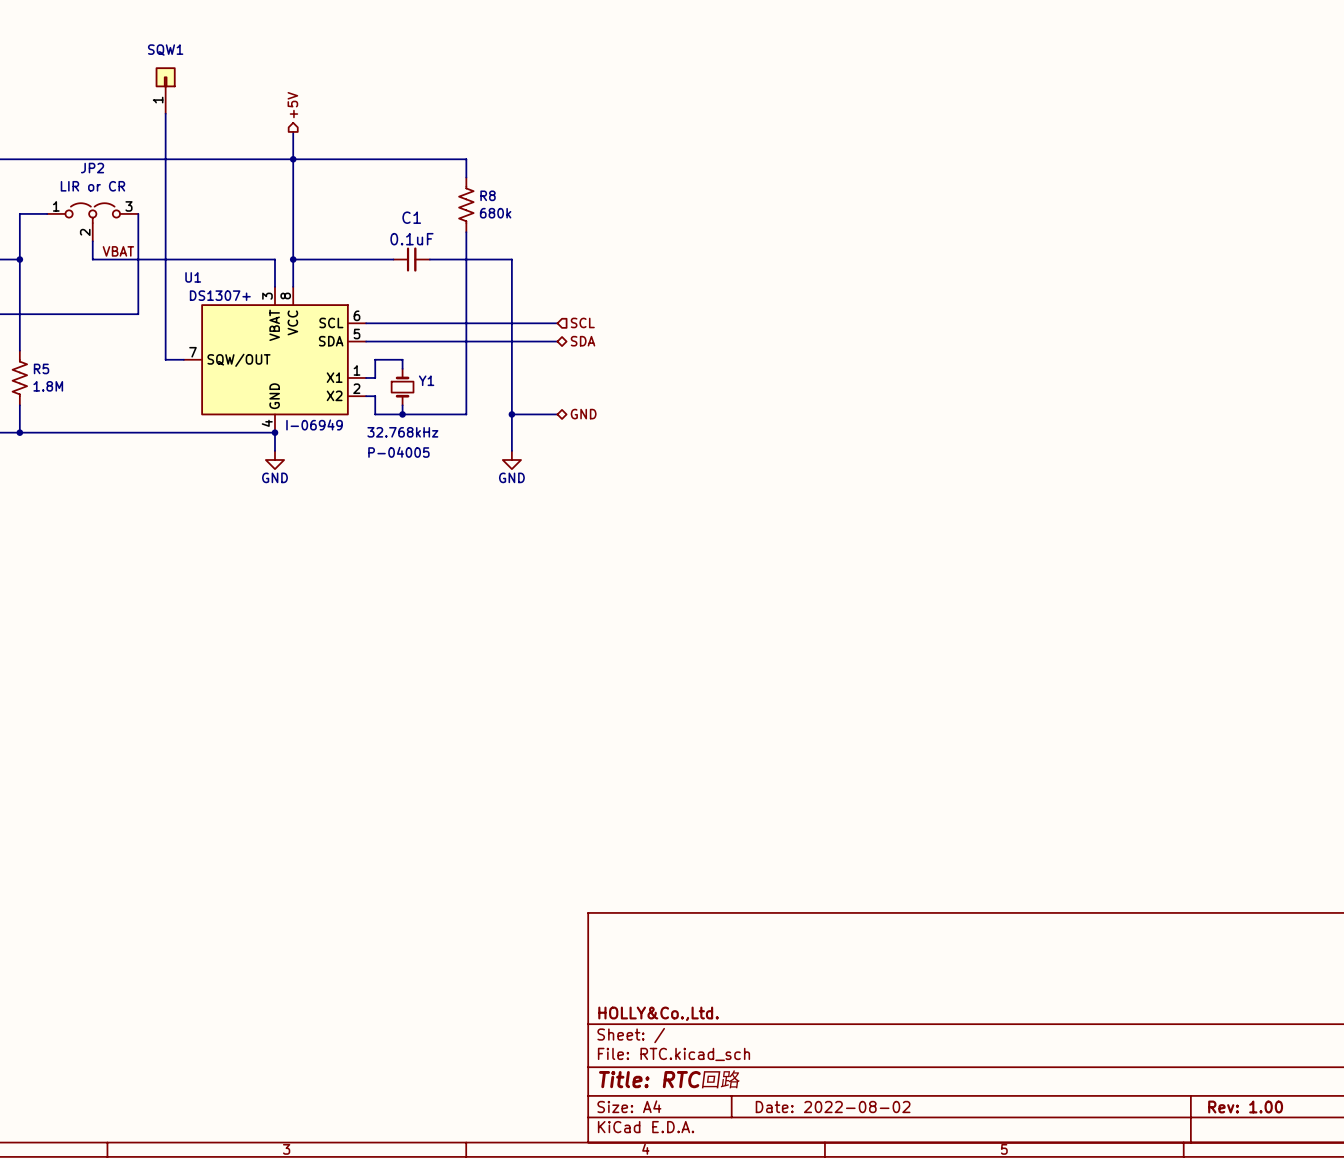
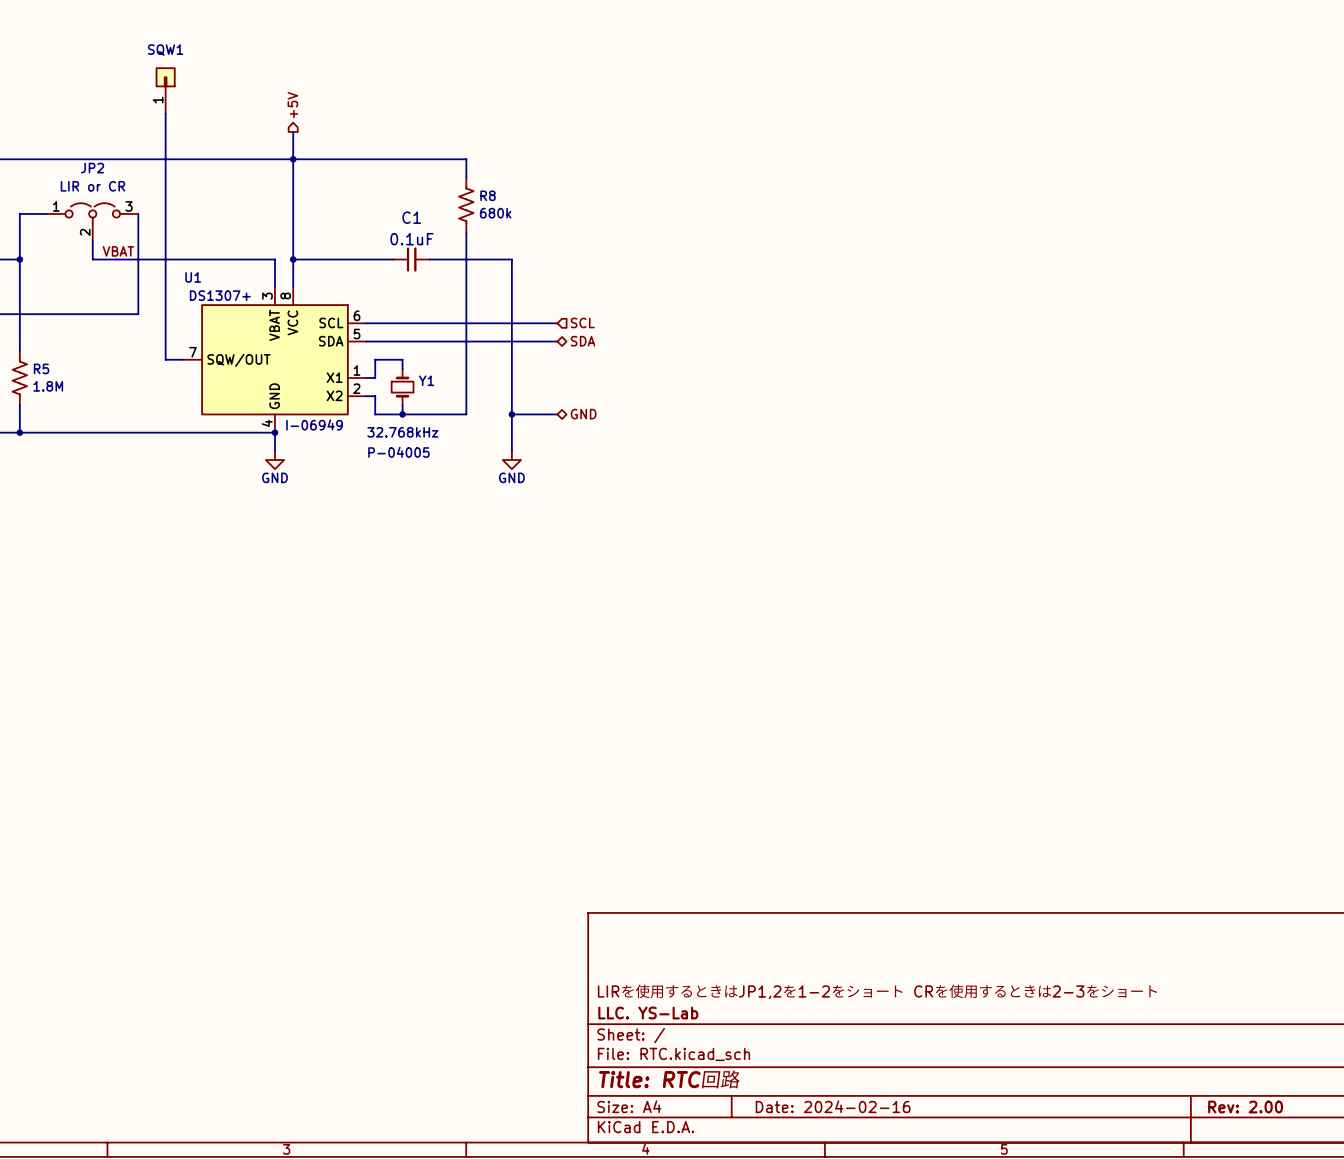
title block: none -> LIRを使用するときはJP1,2を1-2をショート CRを使用するときは2-3をショート (877, 991)
title block: HOLLY&Co.,Ltd. (658, 1013) -> LLC. YS-Lab (648, 1013)
title block: Date: 2022-08-02 (833, 1107) -> Date: 2024-02-16 (833, 1106)
title block: Rev: 1.00 (1245, 1107) -> Rev: 2.00 (1245, 1107)

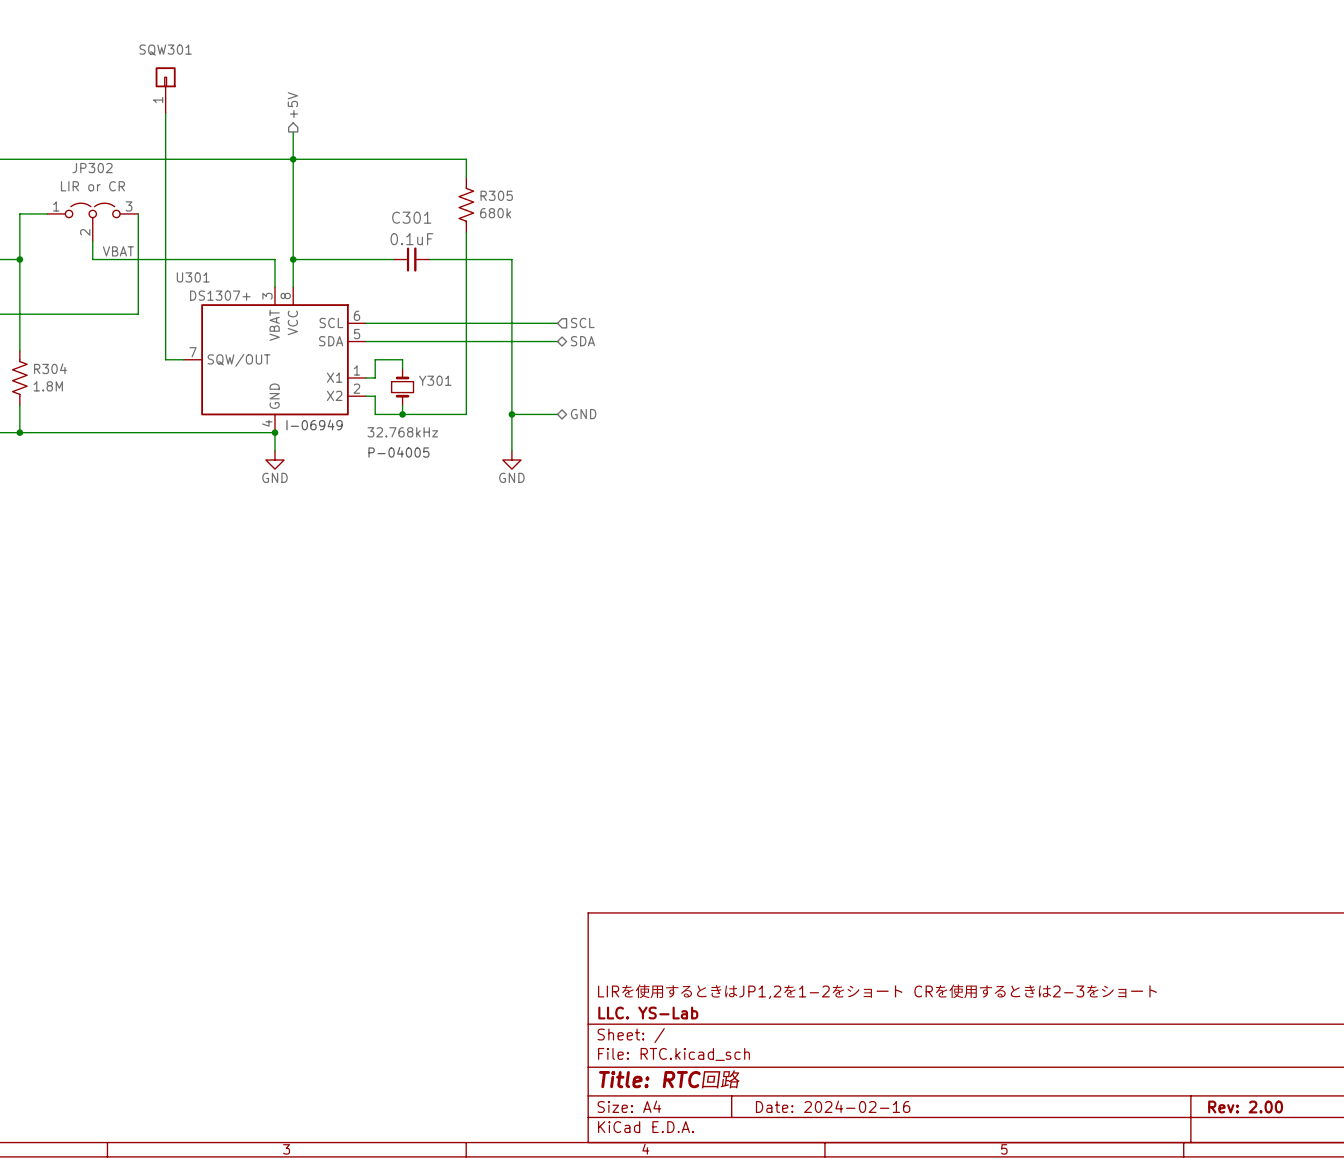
SQW1 name: SQW1 (165, 50) -> SQW301 (165, 50)
JP2 name: JP2 (92, 168) -> JP302 (92, 168)
R8 name: R8 (488, 195) -> R305 (496, 195)
C1 name: C1 (411, 217) -> C301 (411, 217)
U1 name: U1 (193, 277) -> U301 (193, 277)
R5 name: R5 (41, 368) -> R304 (50, 368)
Y1 name: Y1 (426, 380) -> Y301 (435, 380)

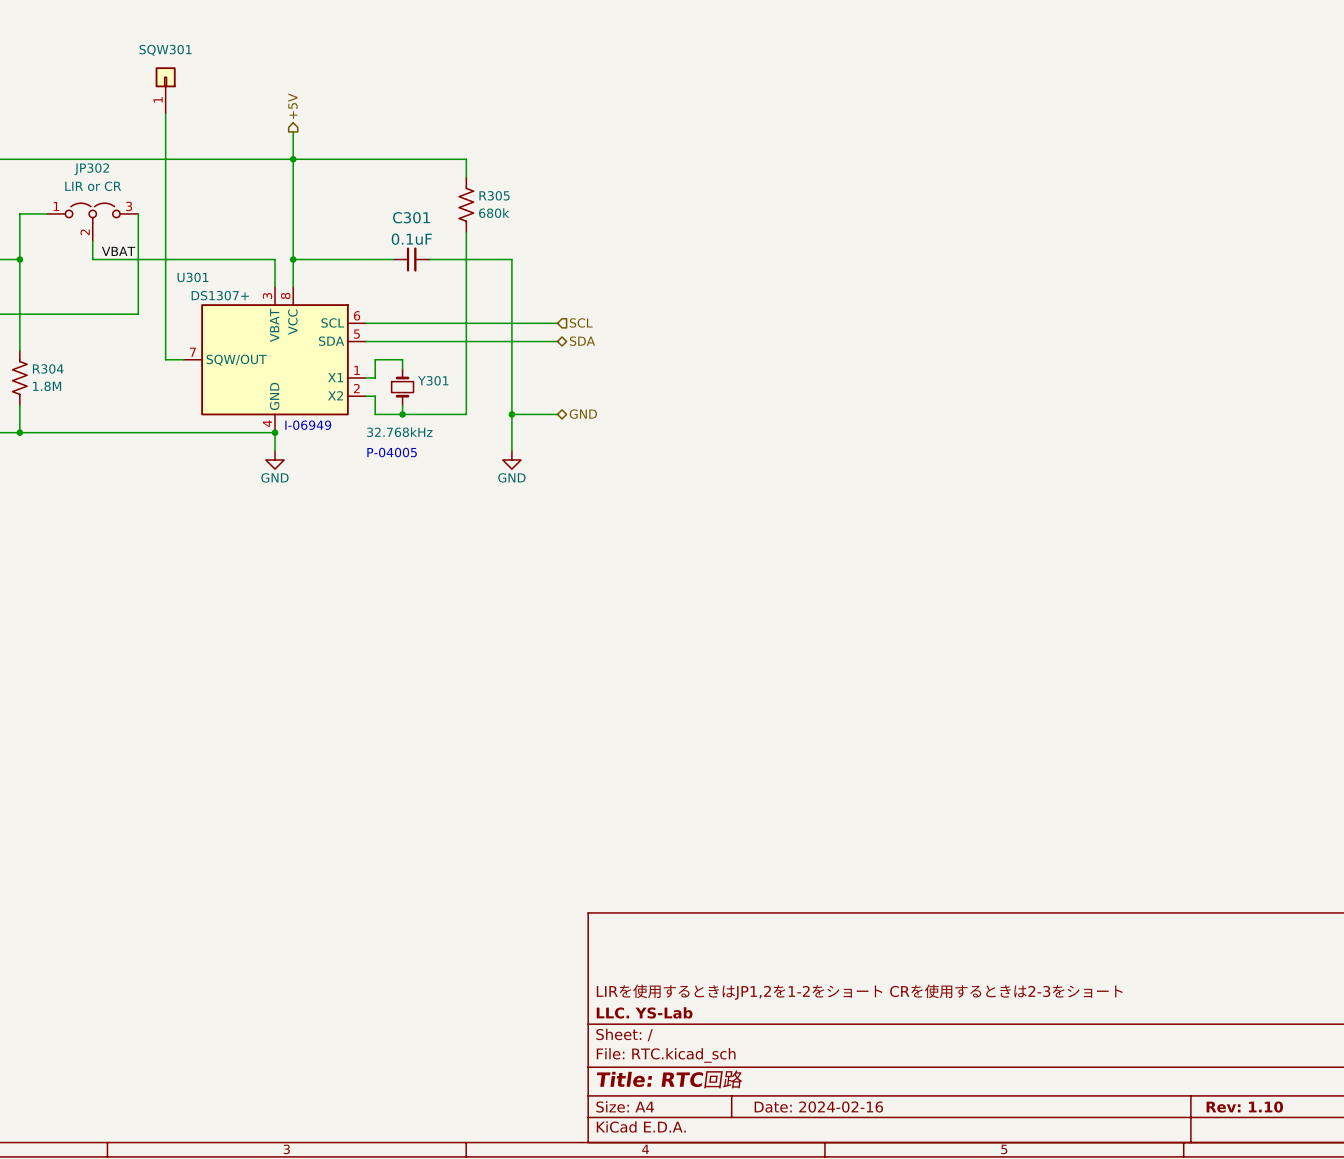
title block: Rev: 2.00 (1245, 1107) -> Rev: 1.10 (1244, 1107)

